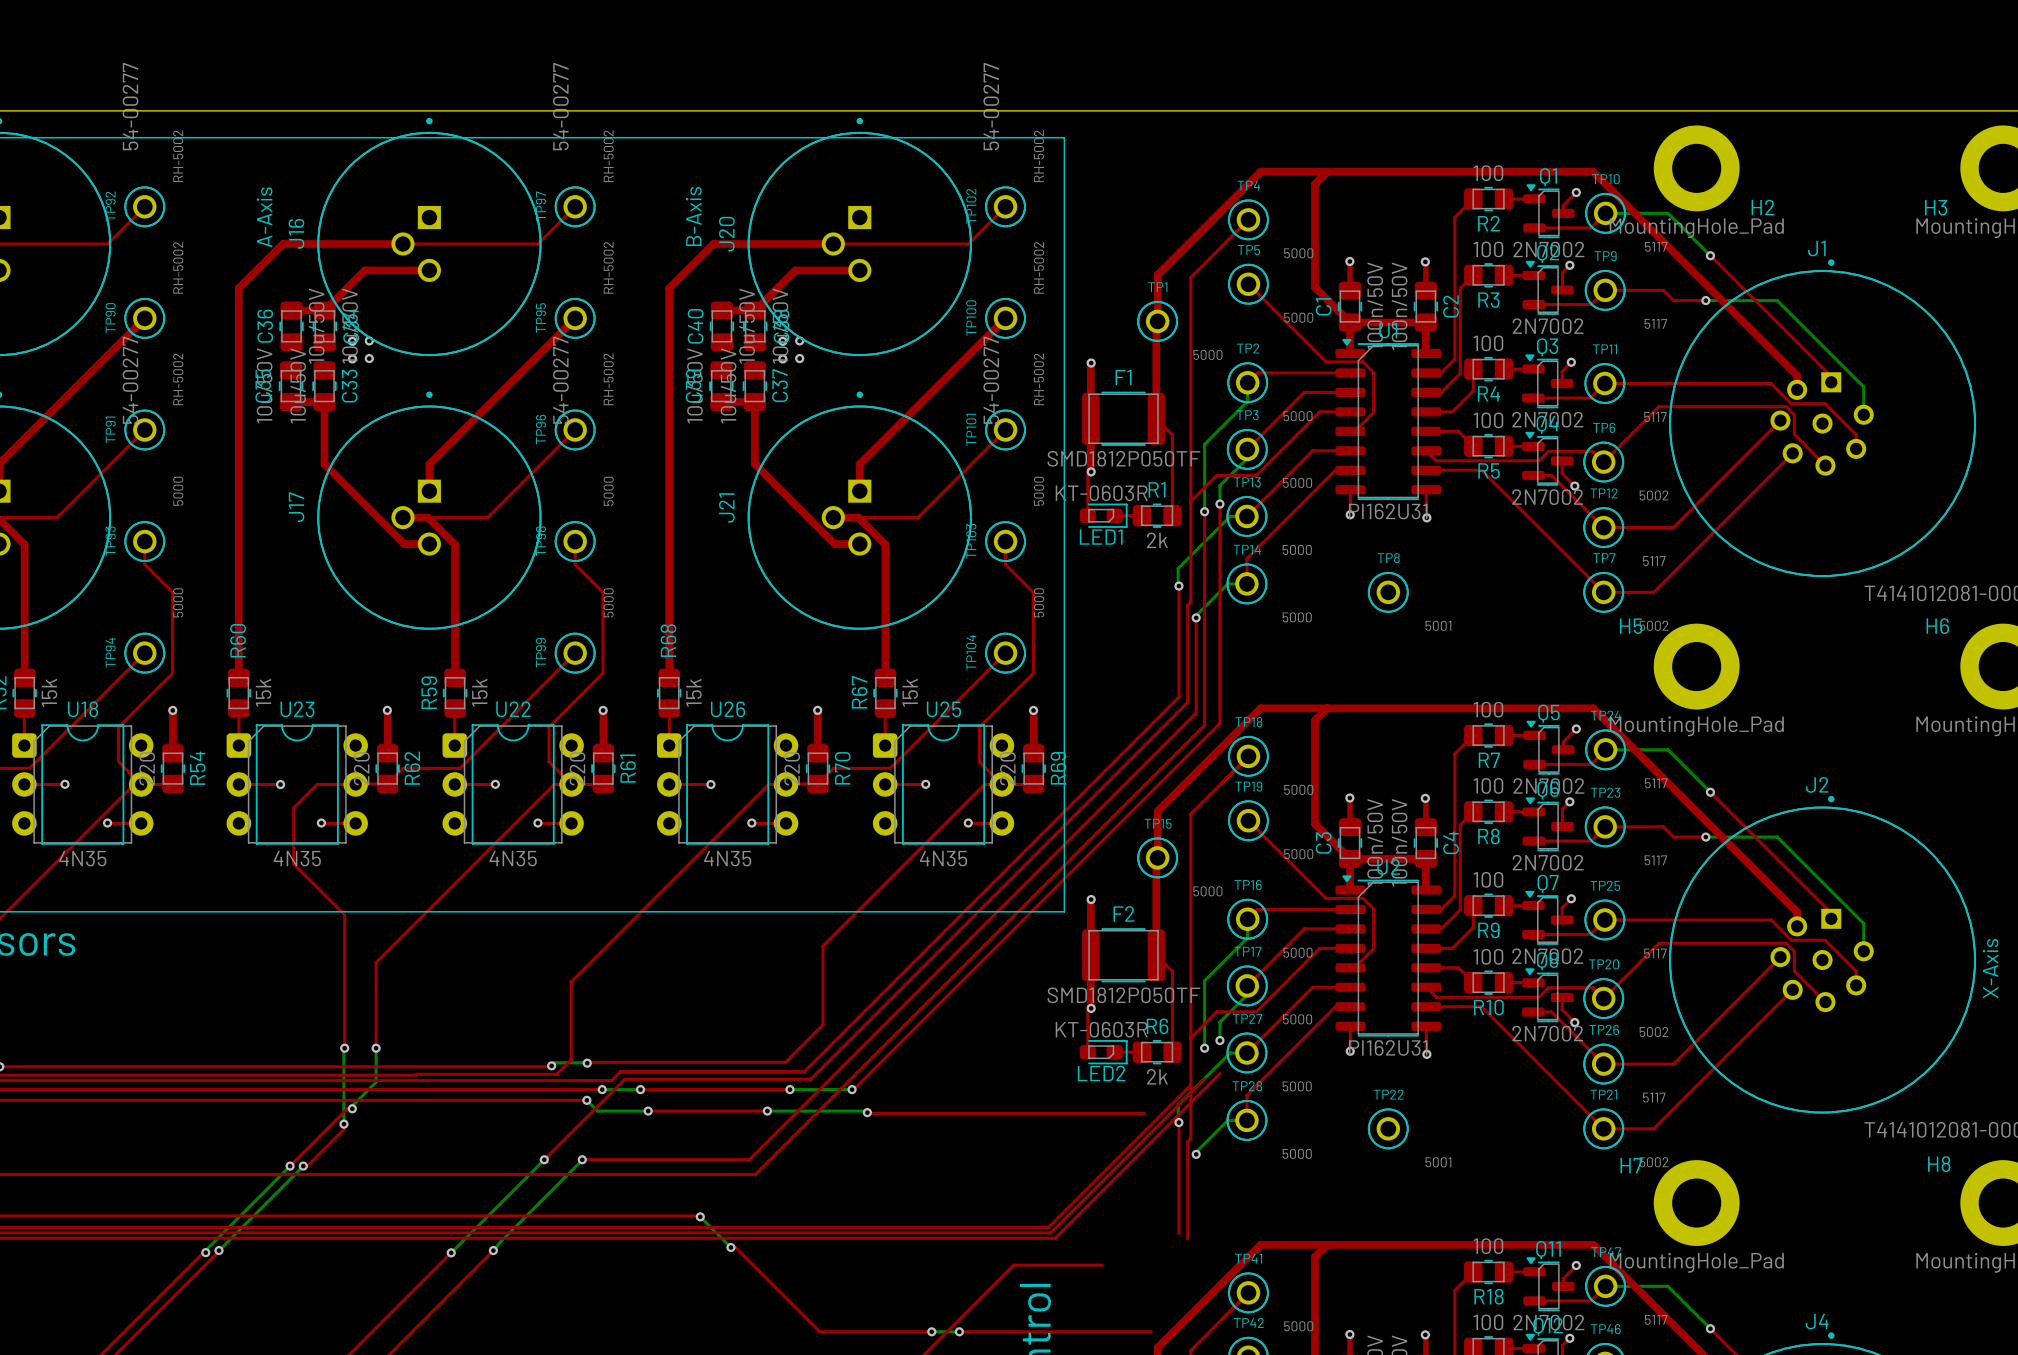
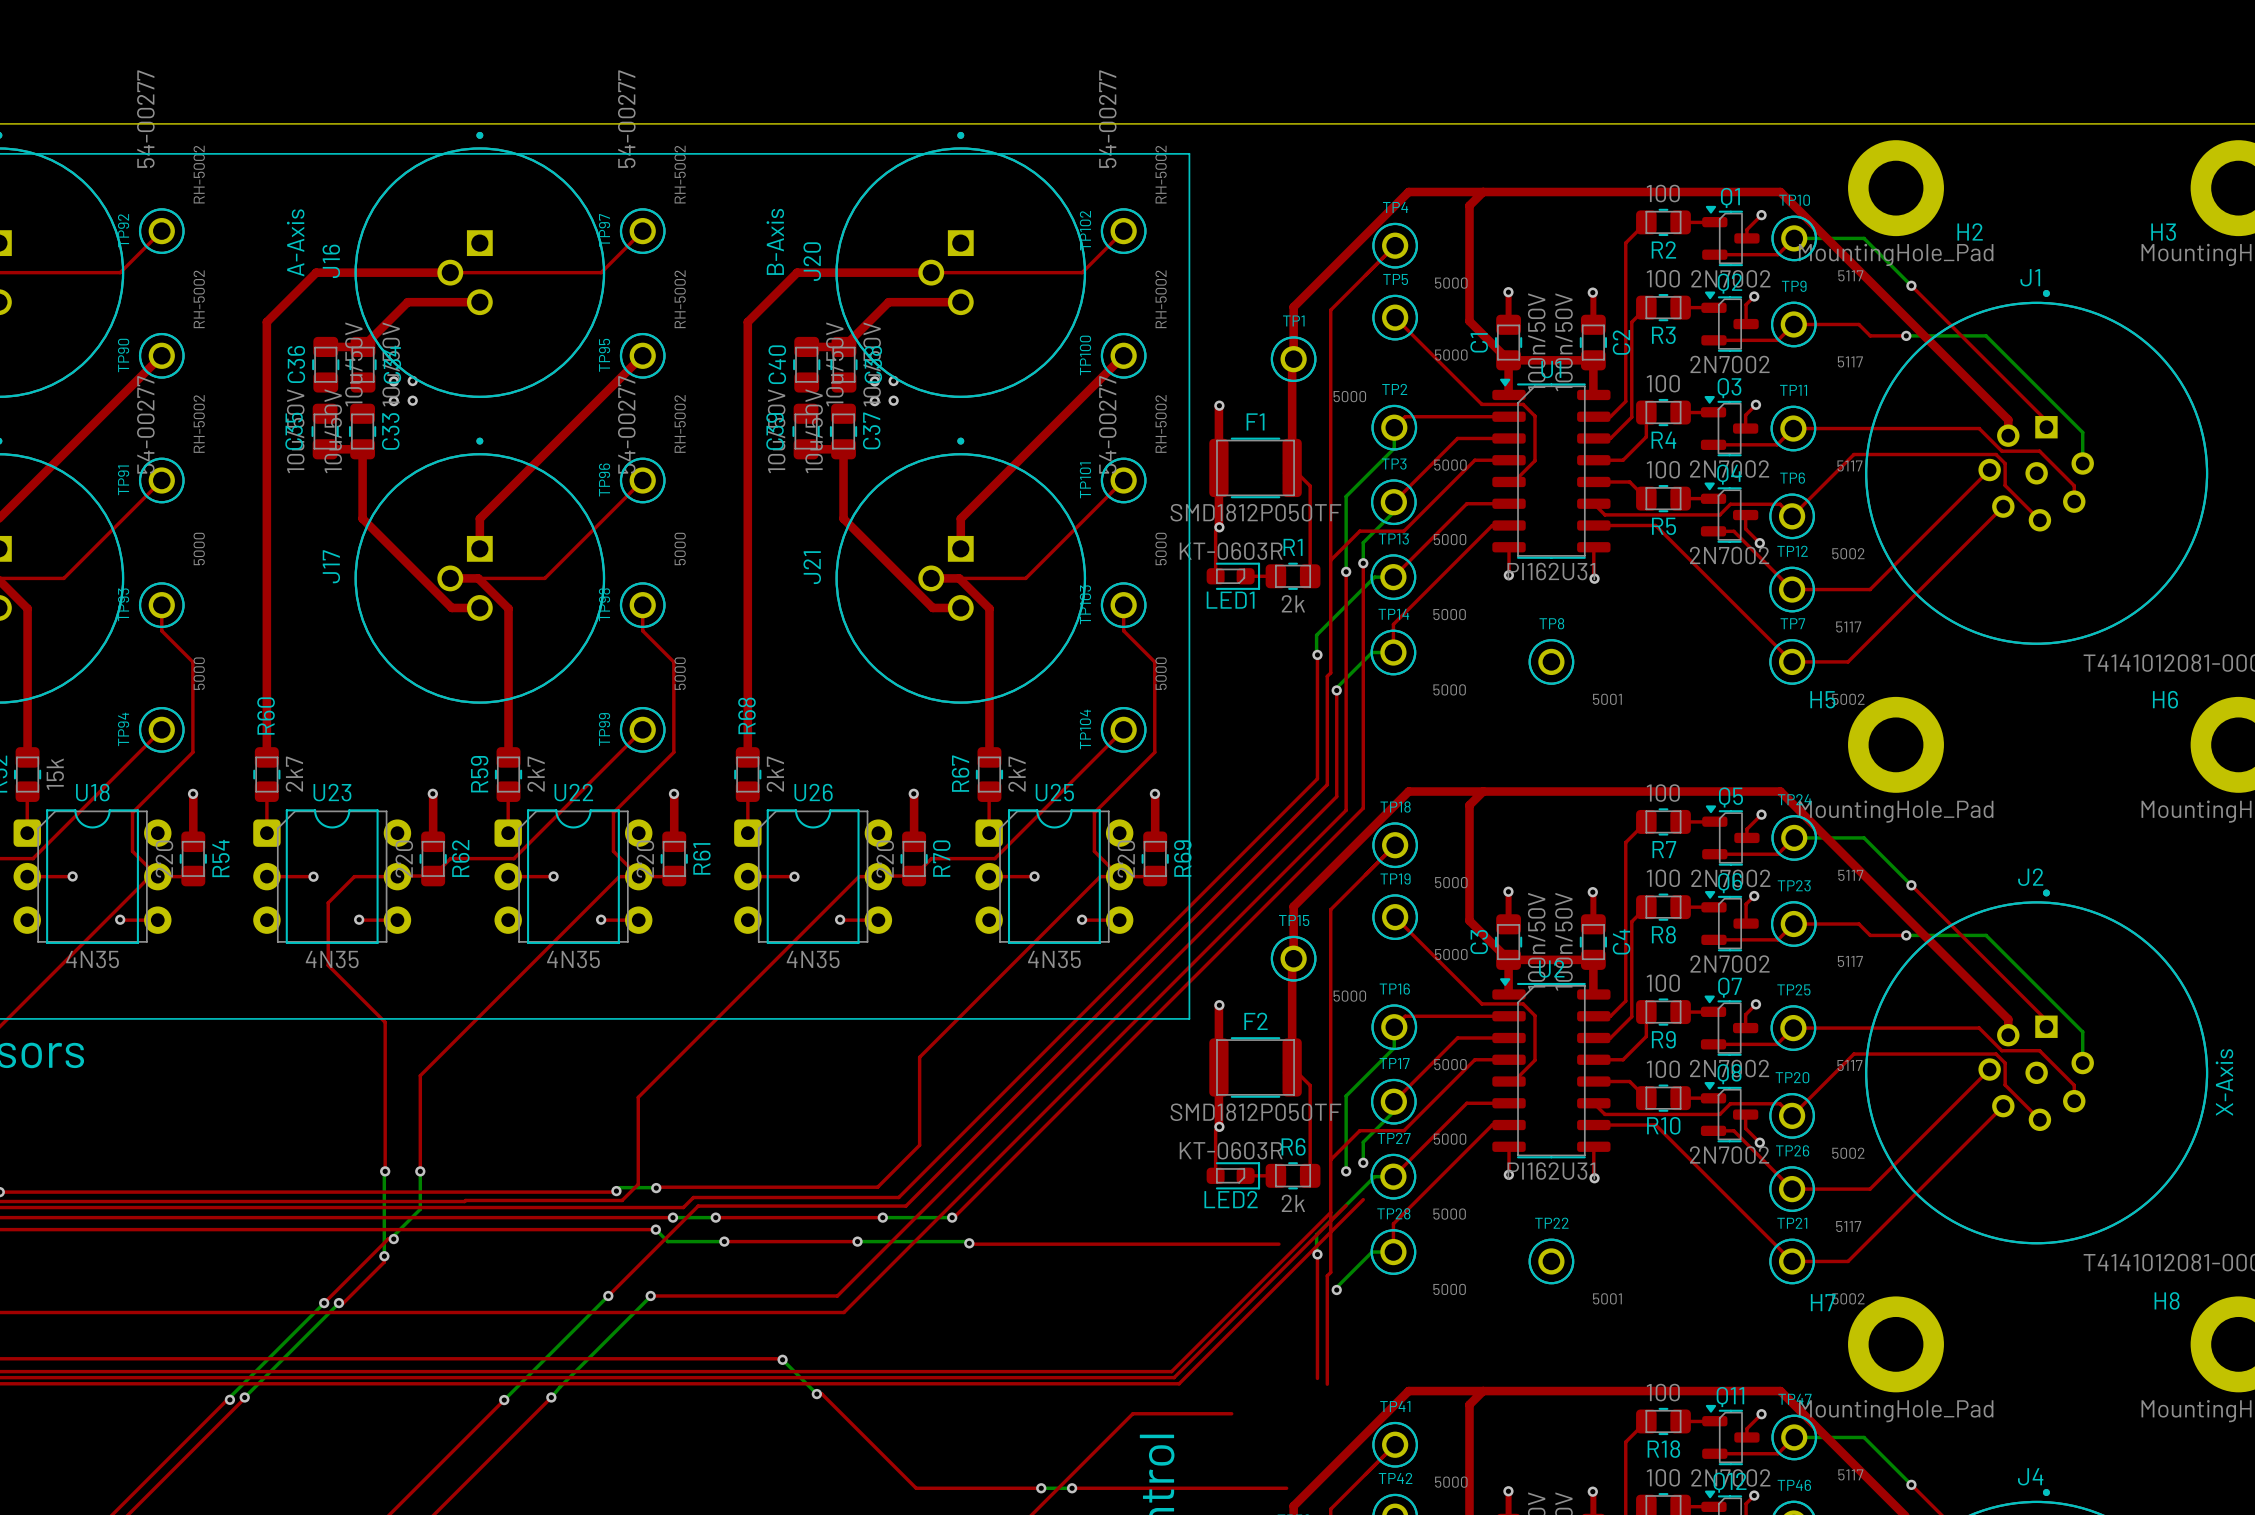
R60 value: 15k (263, 692) -> 2k7 (294, 774)
R59 value: 15k (479, 692) -> 2k7 (536, 774)
R68 value: 15k (693, 692) -> 2k7 (775, 774)
R67 value: 15k (910, 692) -> 2k7 (1016, 774)

